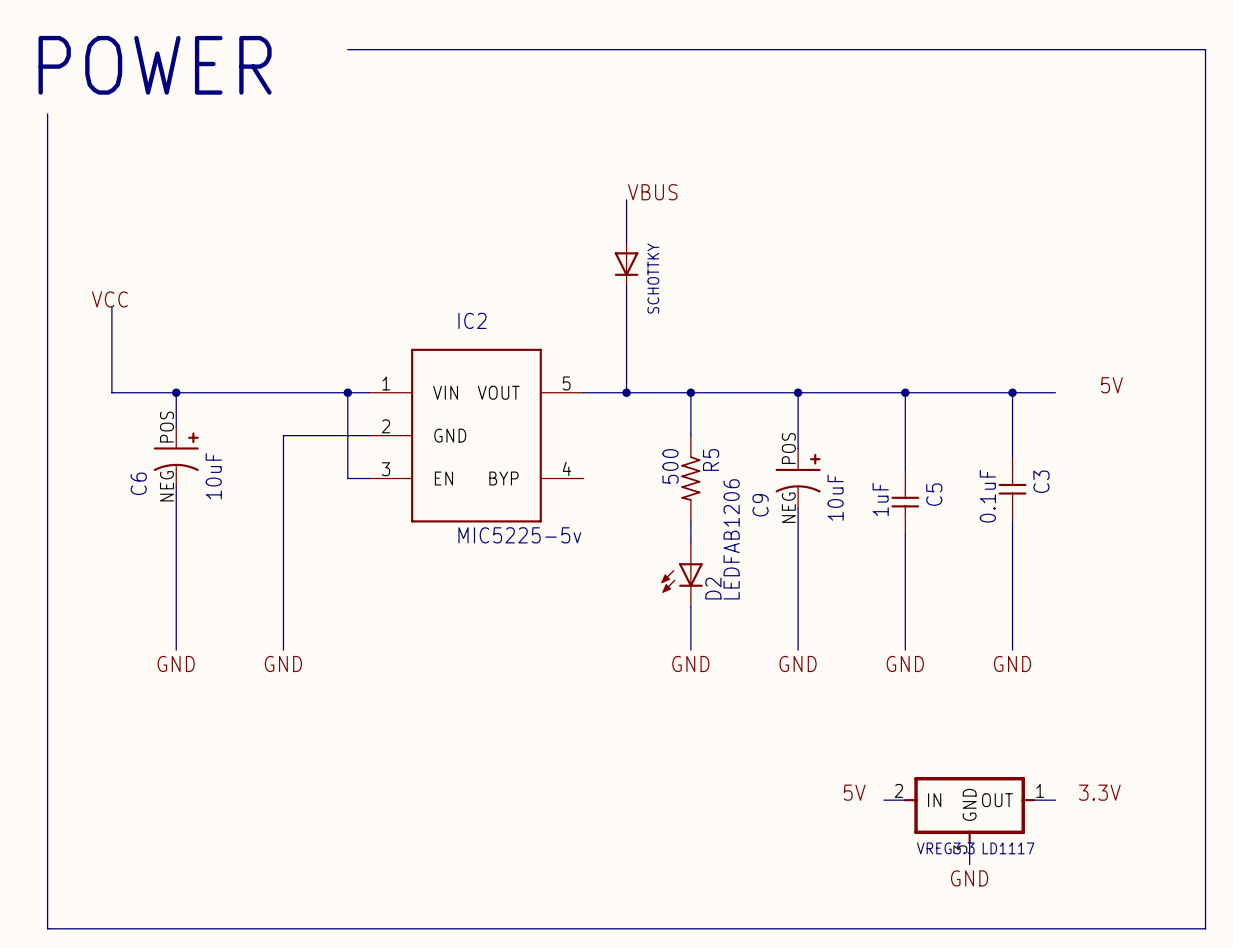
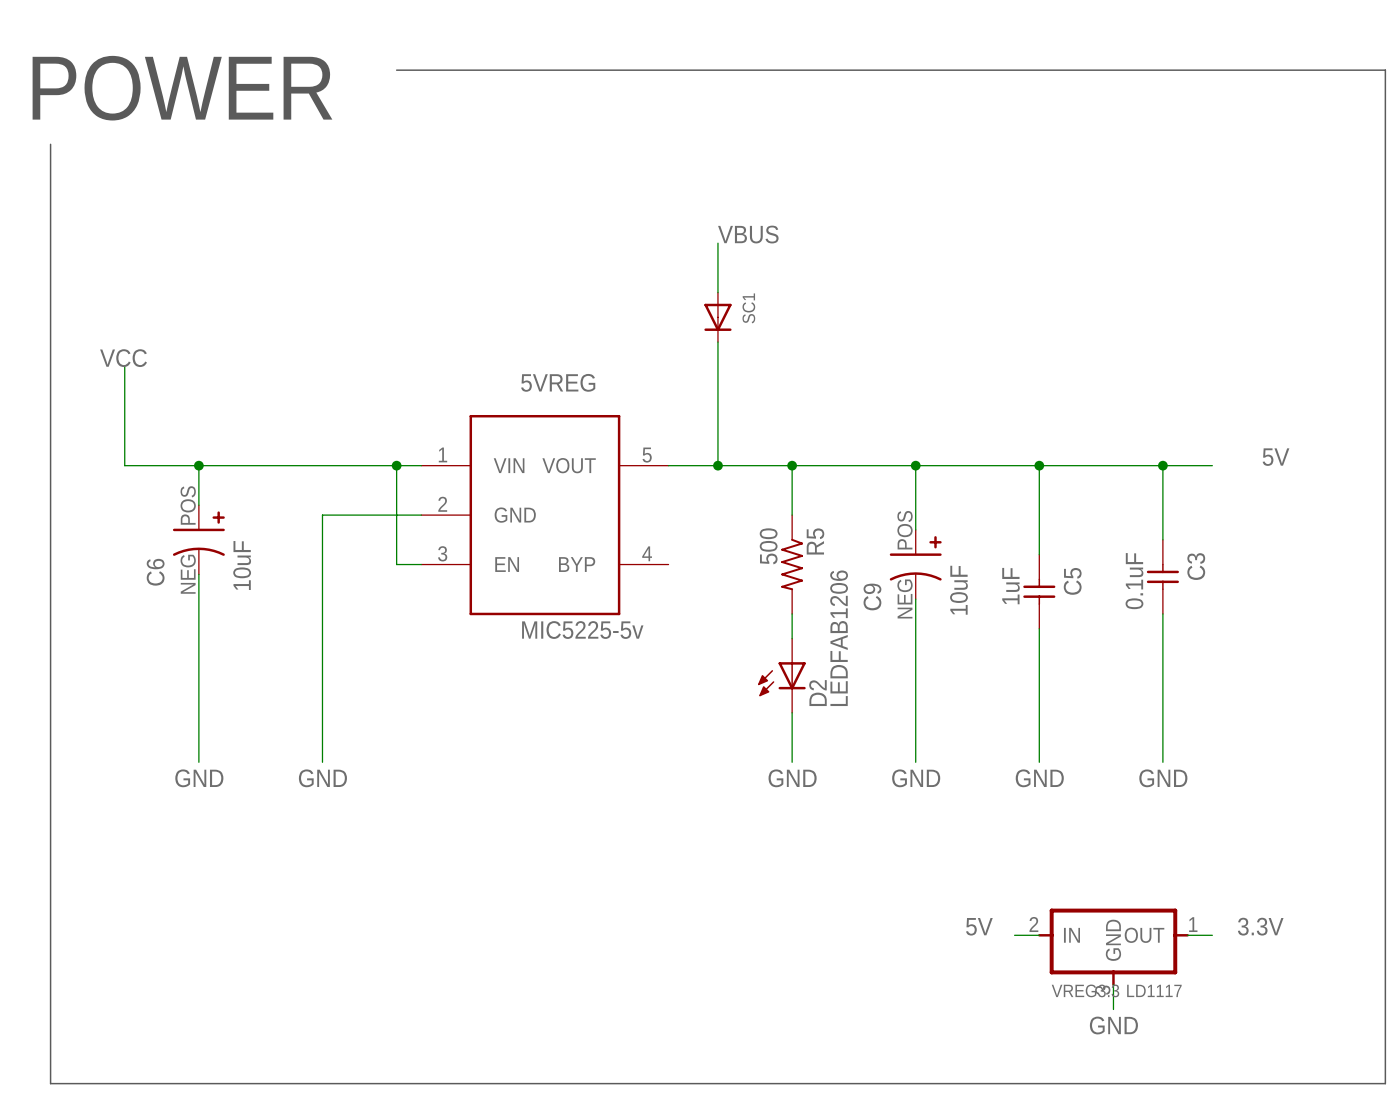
SCHOTTKY name: SCHOTTKY (653, 278) -> SC1 (748, 308)
IC2 name: IC2 (472, 320) -> 5VREG (558, 382)

